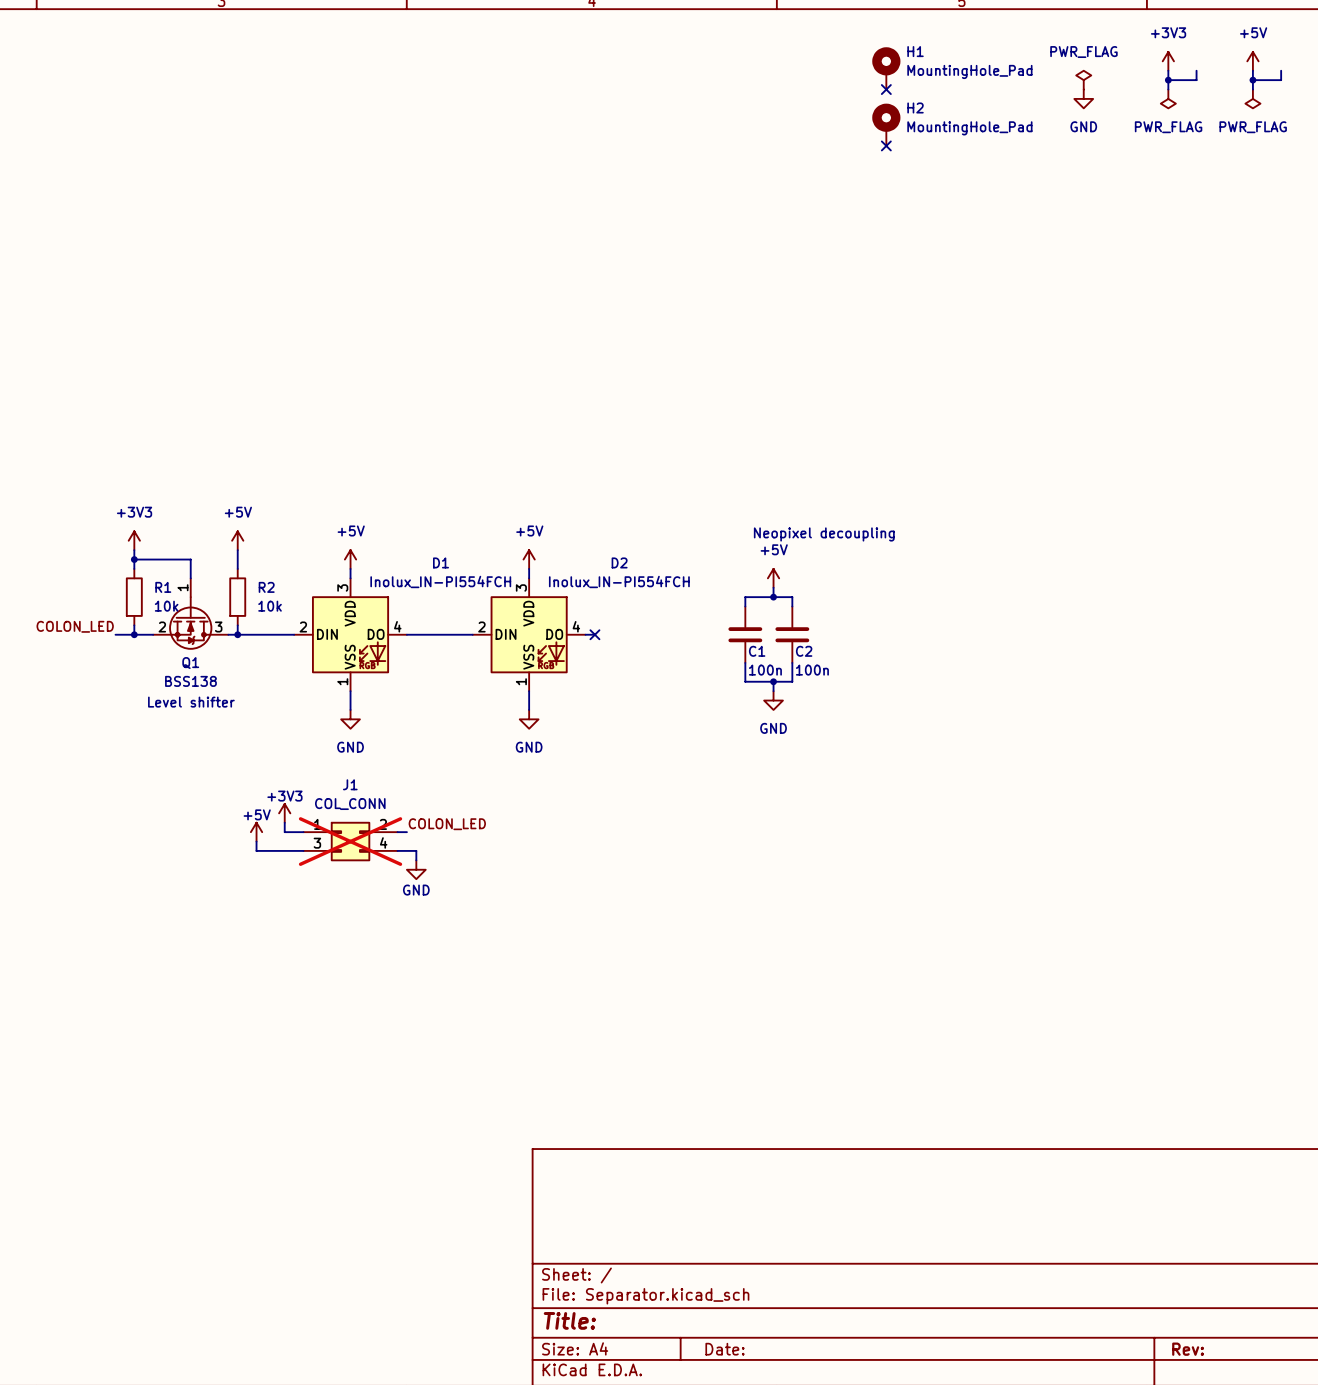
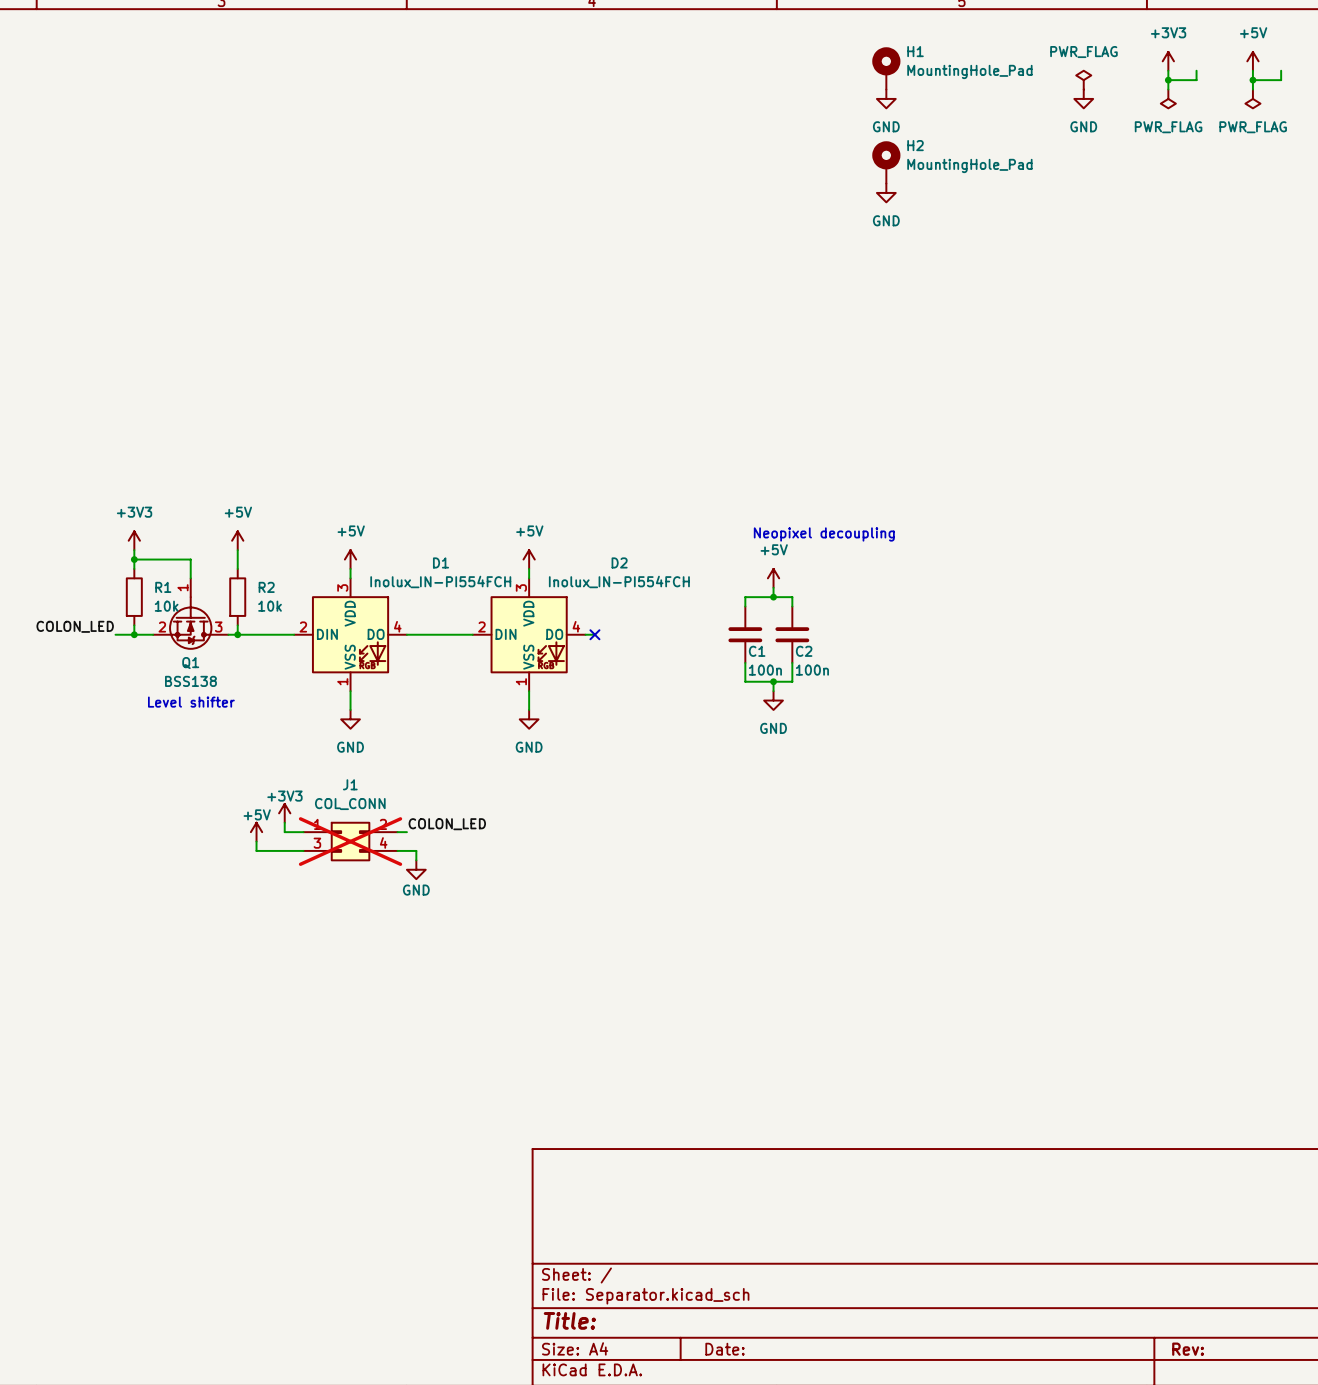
no-connect mark: (886, 89) -> none
power symbol: none -> GND (886, 98)
H2 position: (886, 124) -> (886, 162)
no-connect mark: (886, 145) -> none
power symbol: none -> GND (886, 192)

